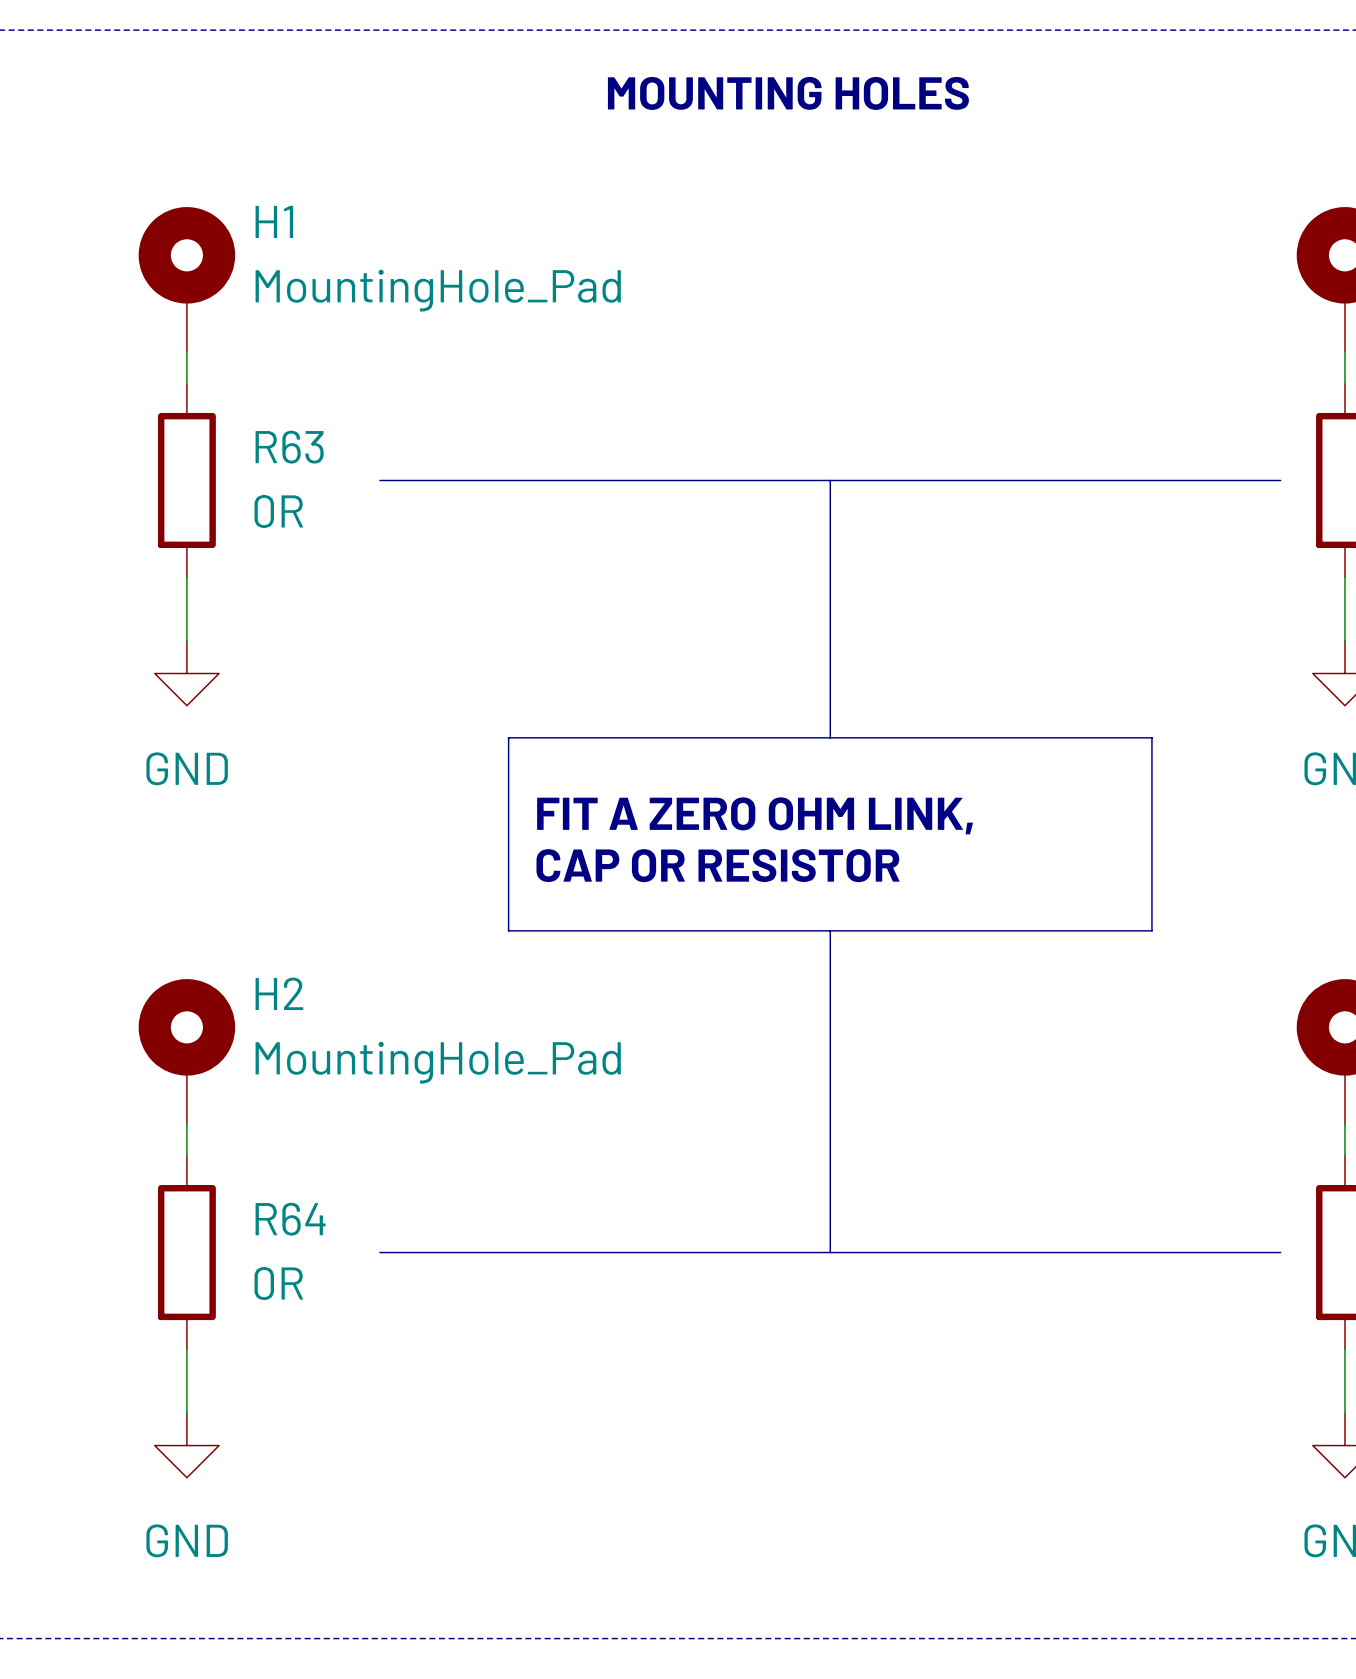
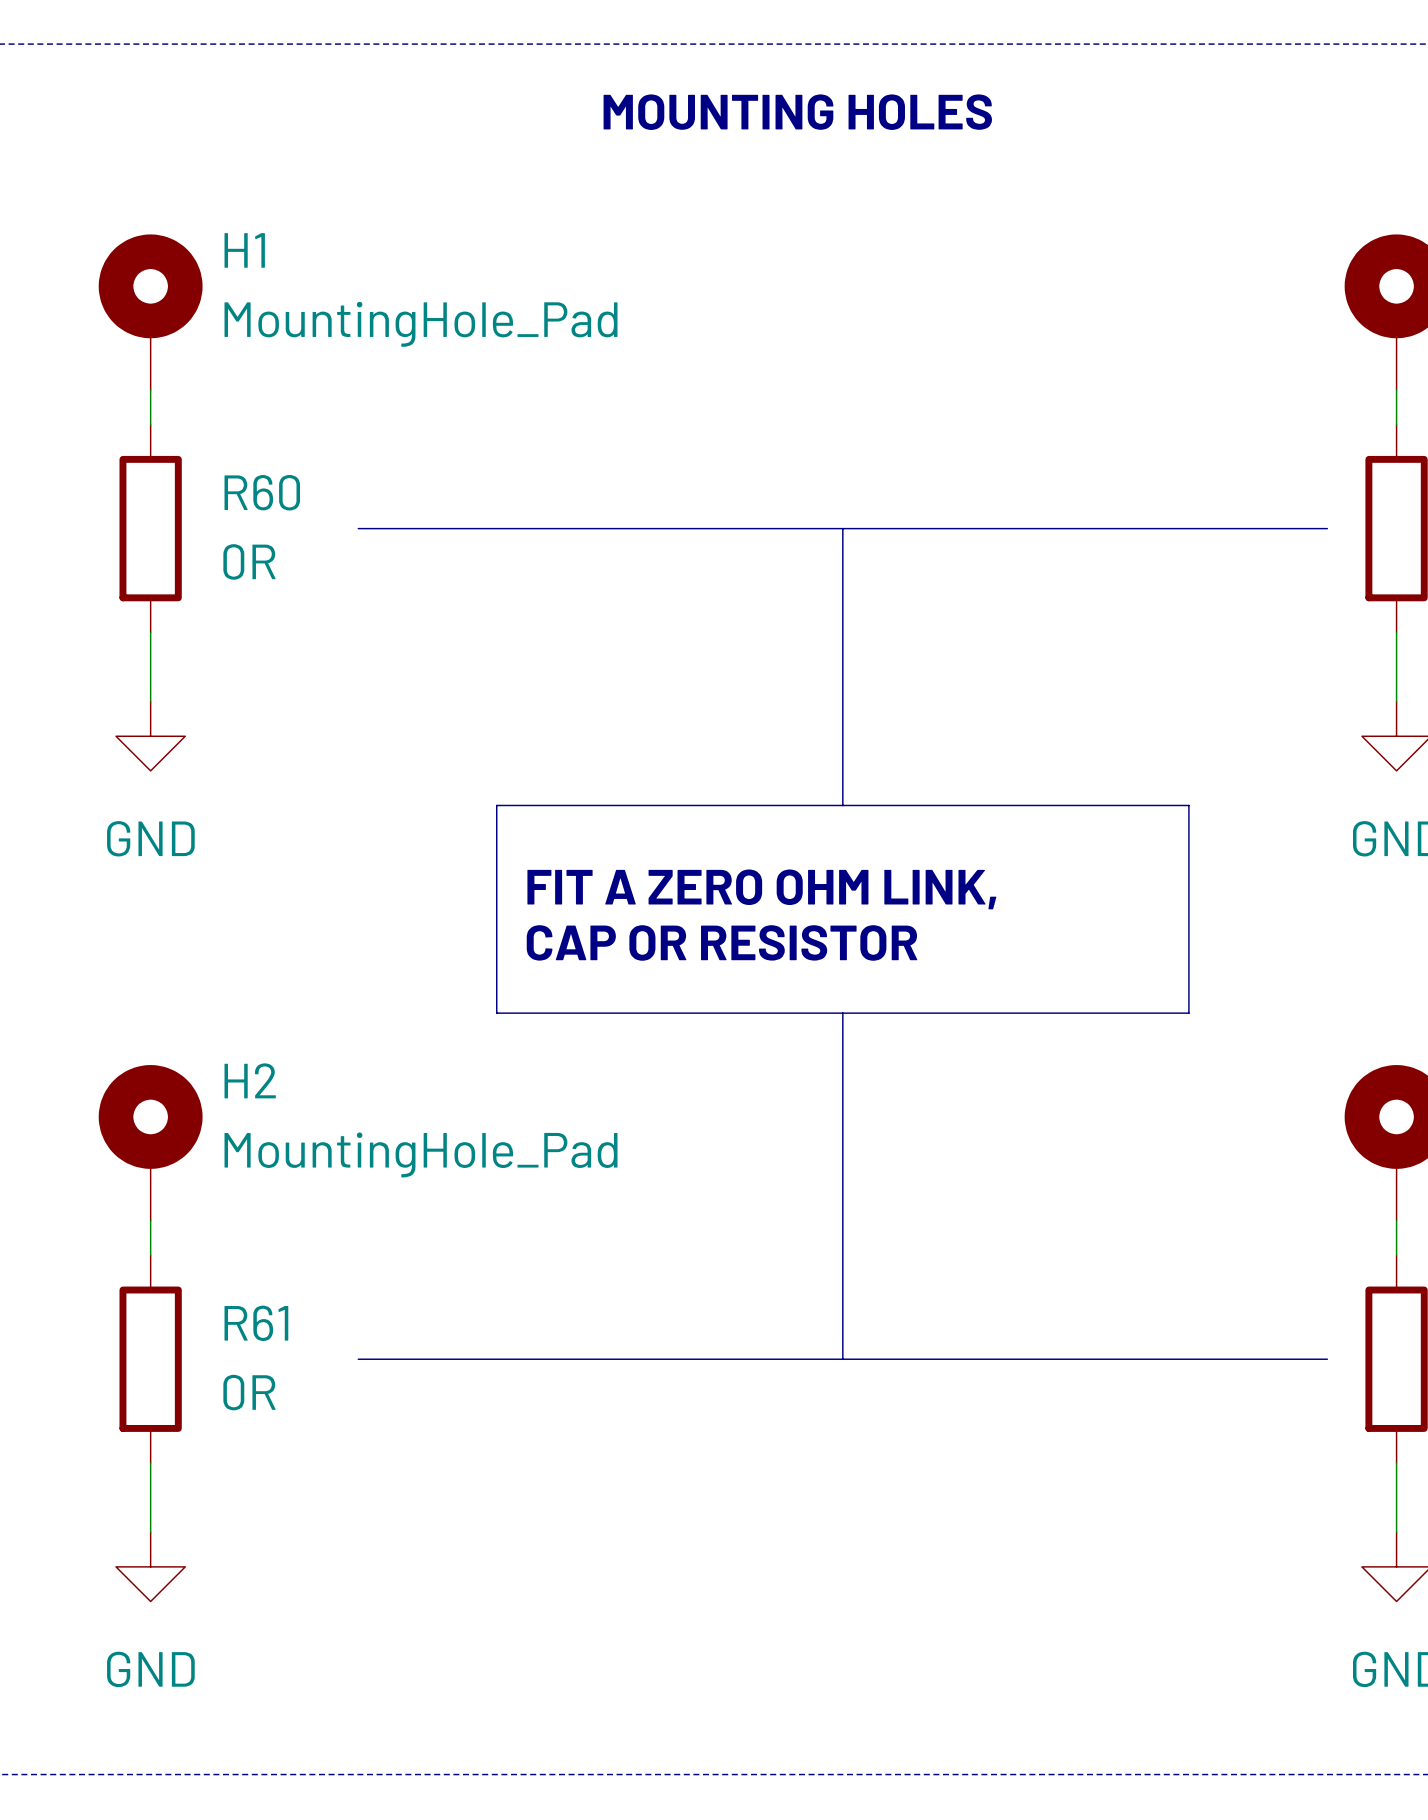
R63 name: R63 (289, 447) -> R60 (262, 492)
R64 name: R64 (290, 1219) -> R61 (256, 1323)

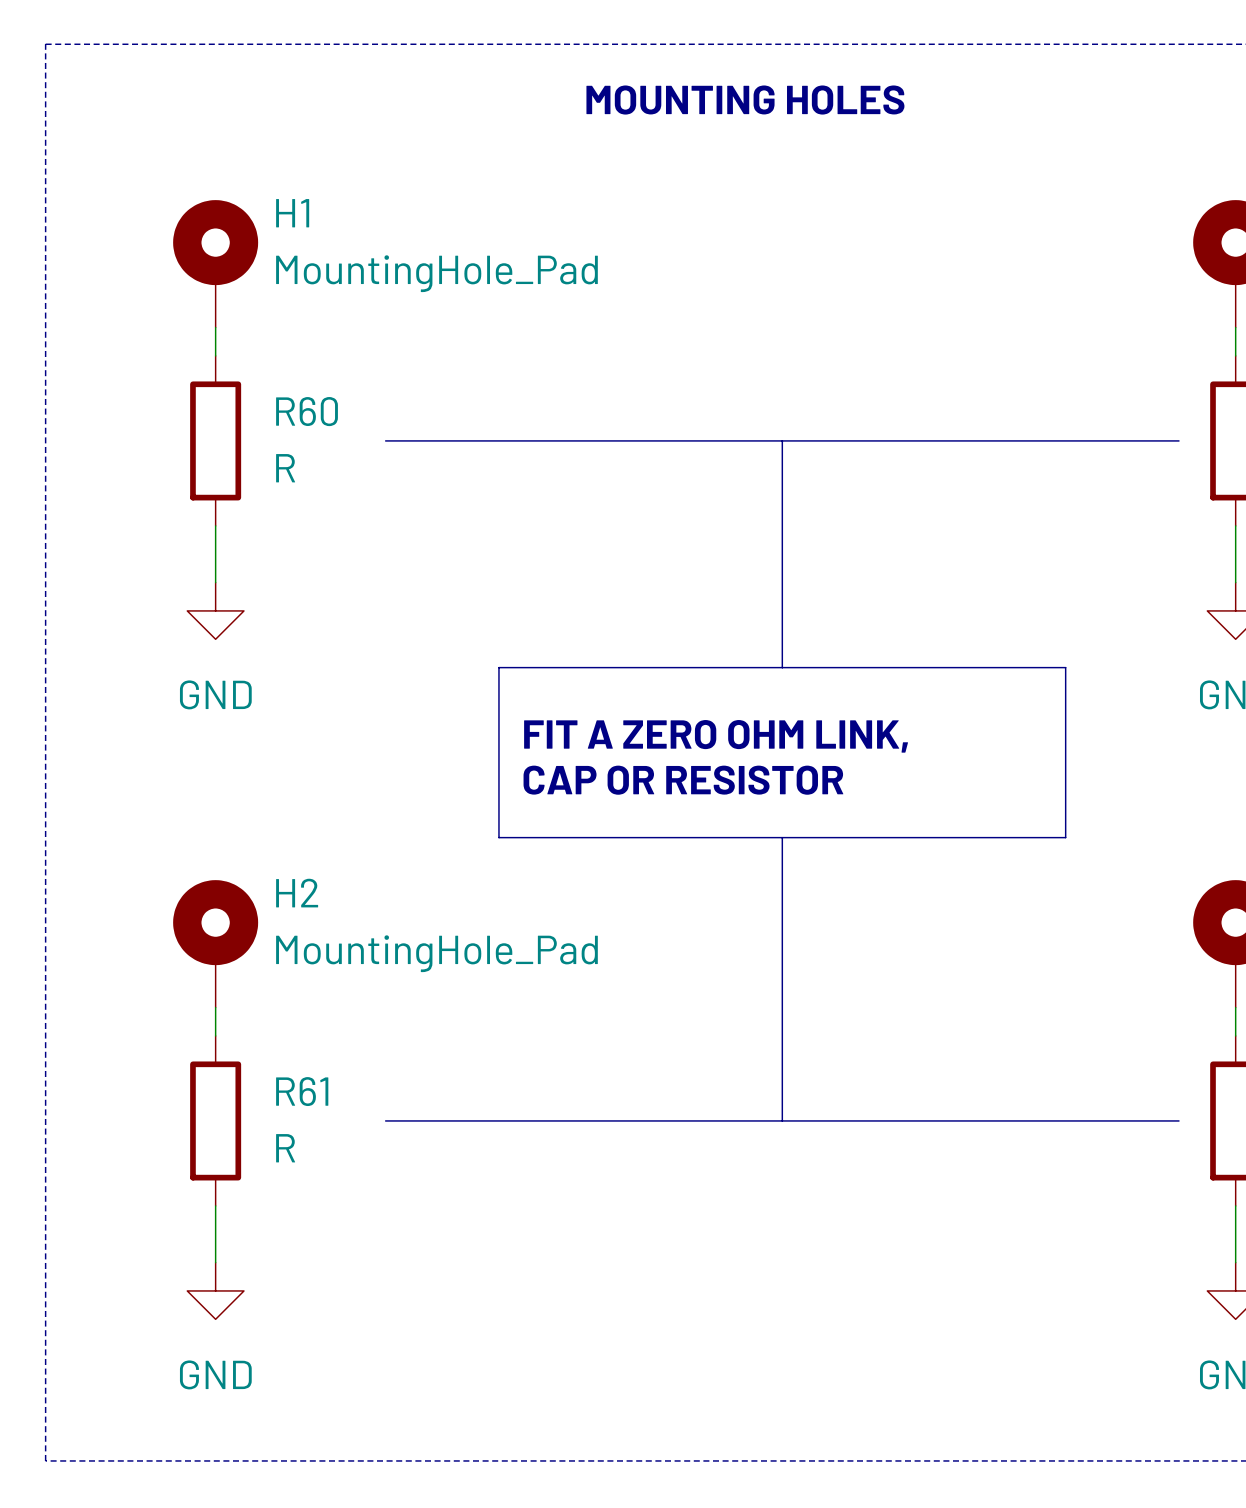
R60 value: 0R (249, 561) -> R (285, 468)
R61 value: 0R (249, 1392) -> R (285, 1148)

